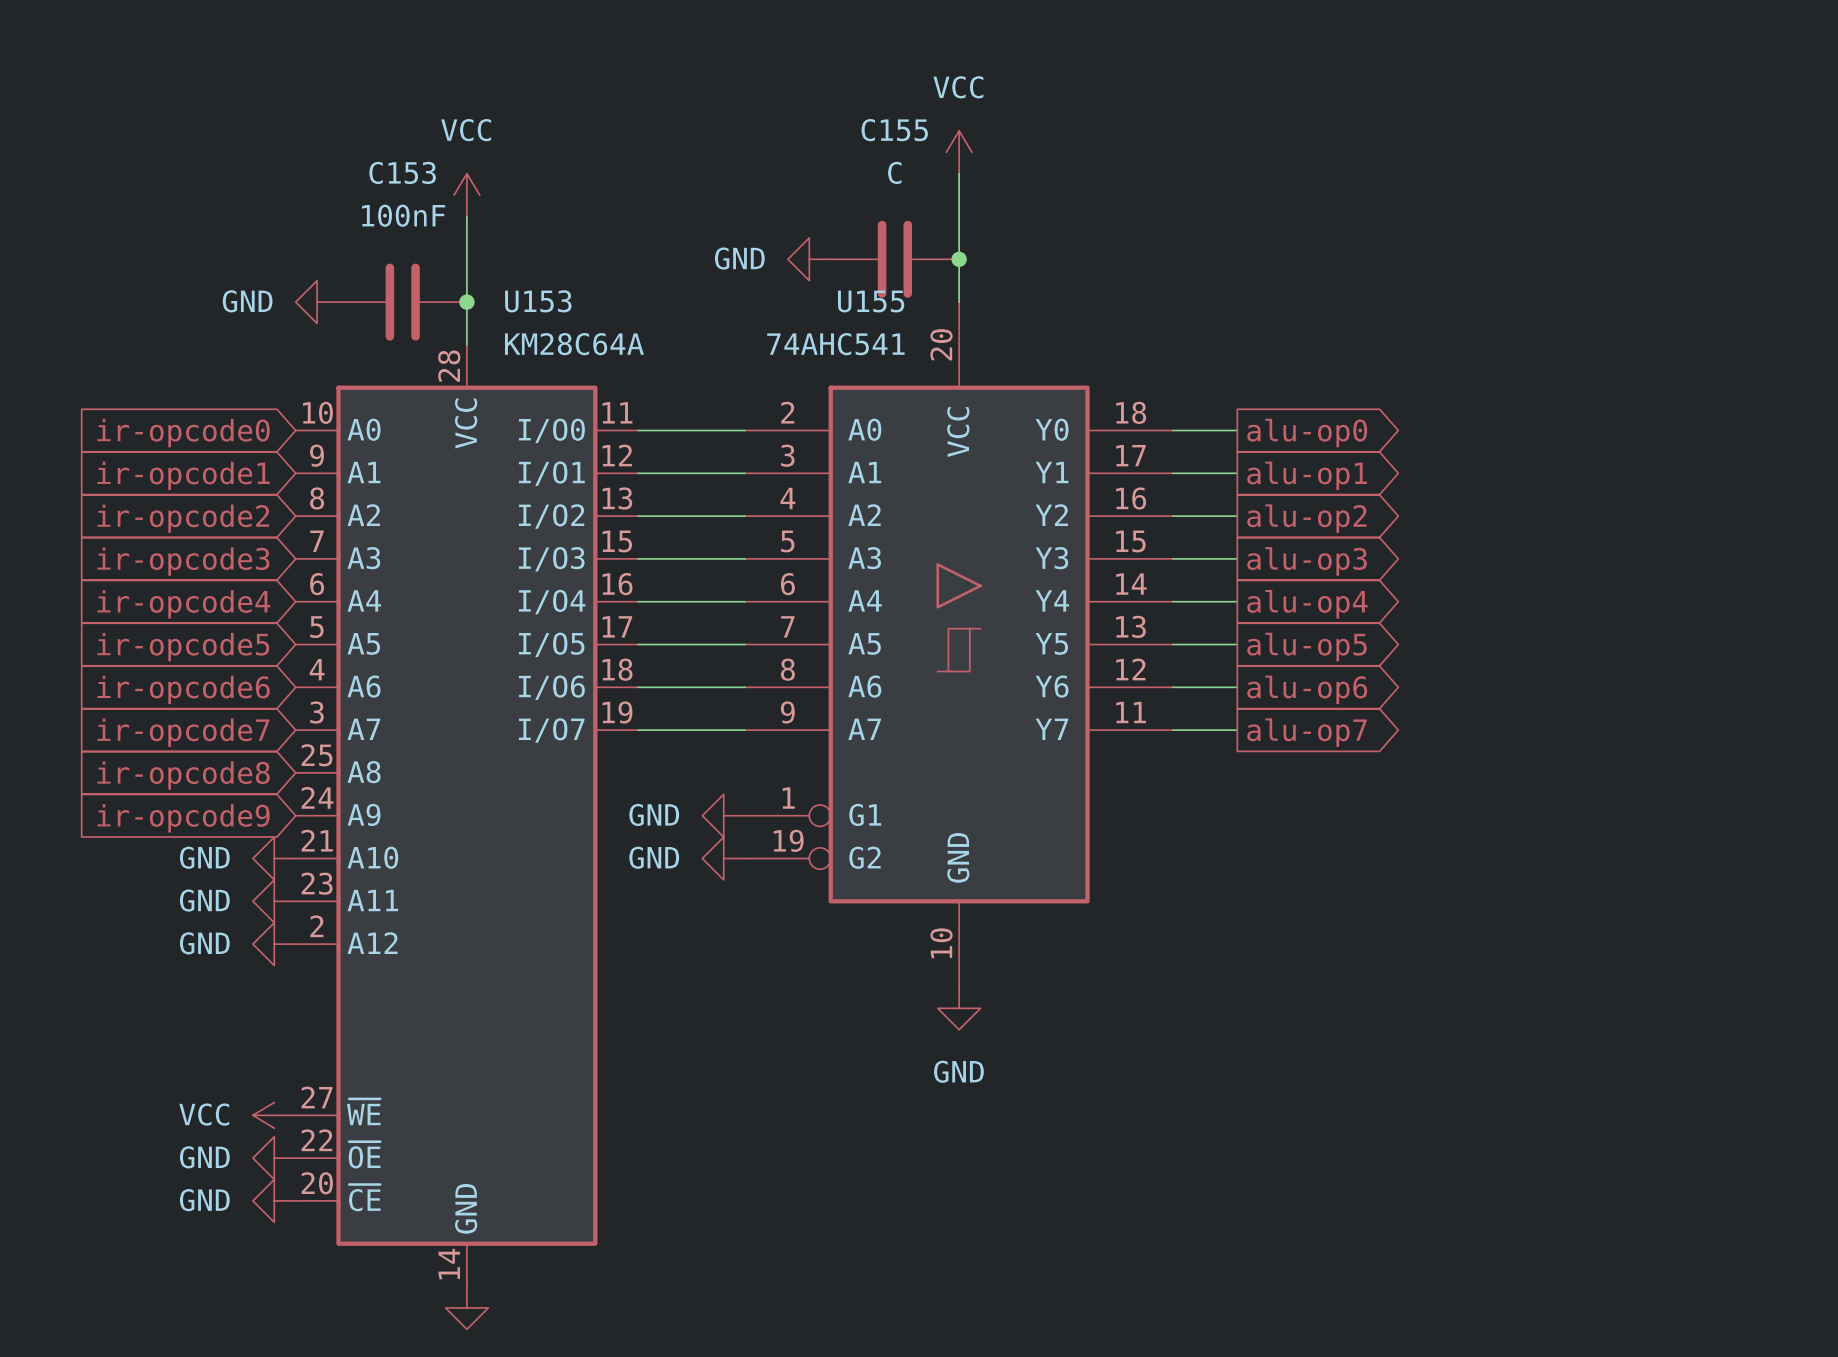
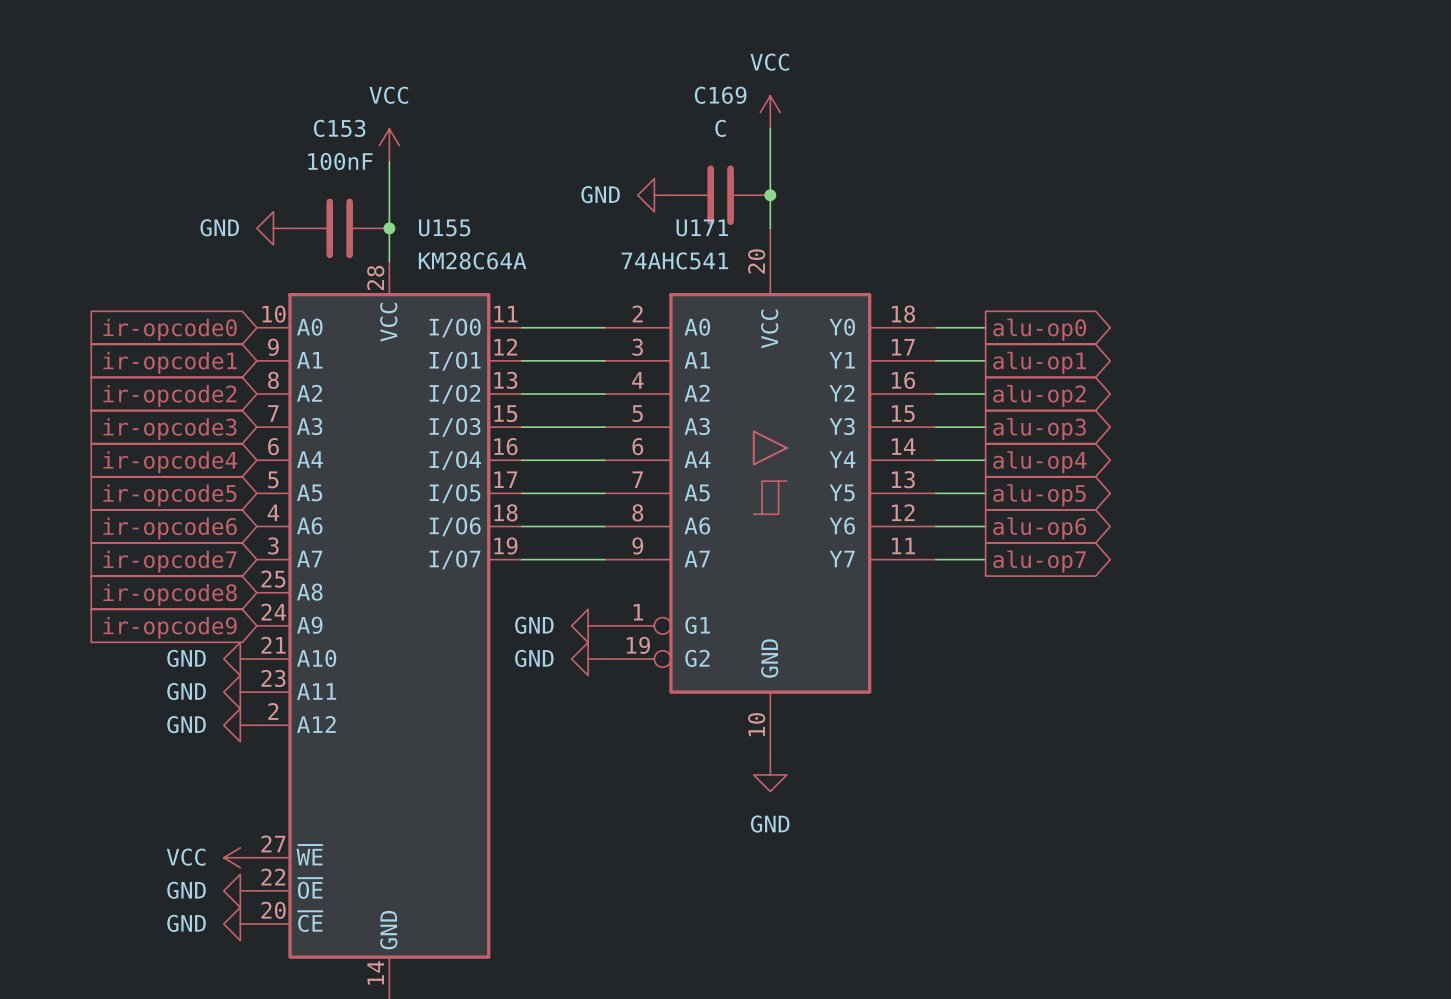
C155 name: C155 (894, 130) -> C169 (720, 95)
U153 name: U153 (538, 301) -> U155 (444, 227)
U155 name: U155 (871, 301) -> U171 (702, 227)

